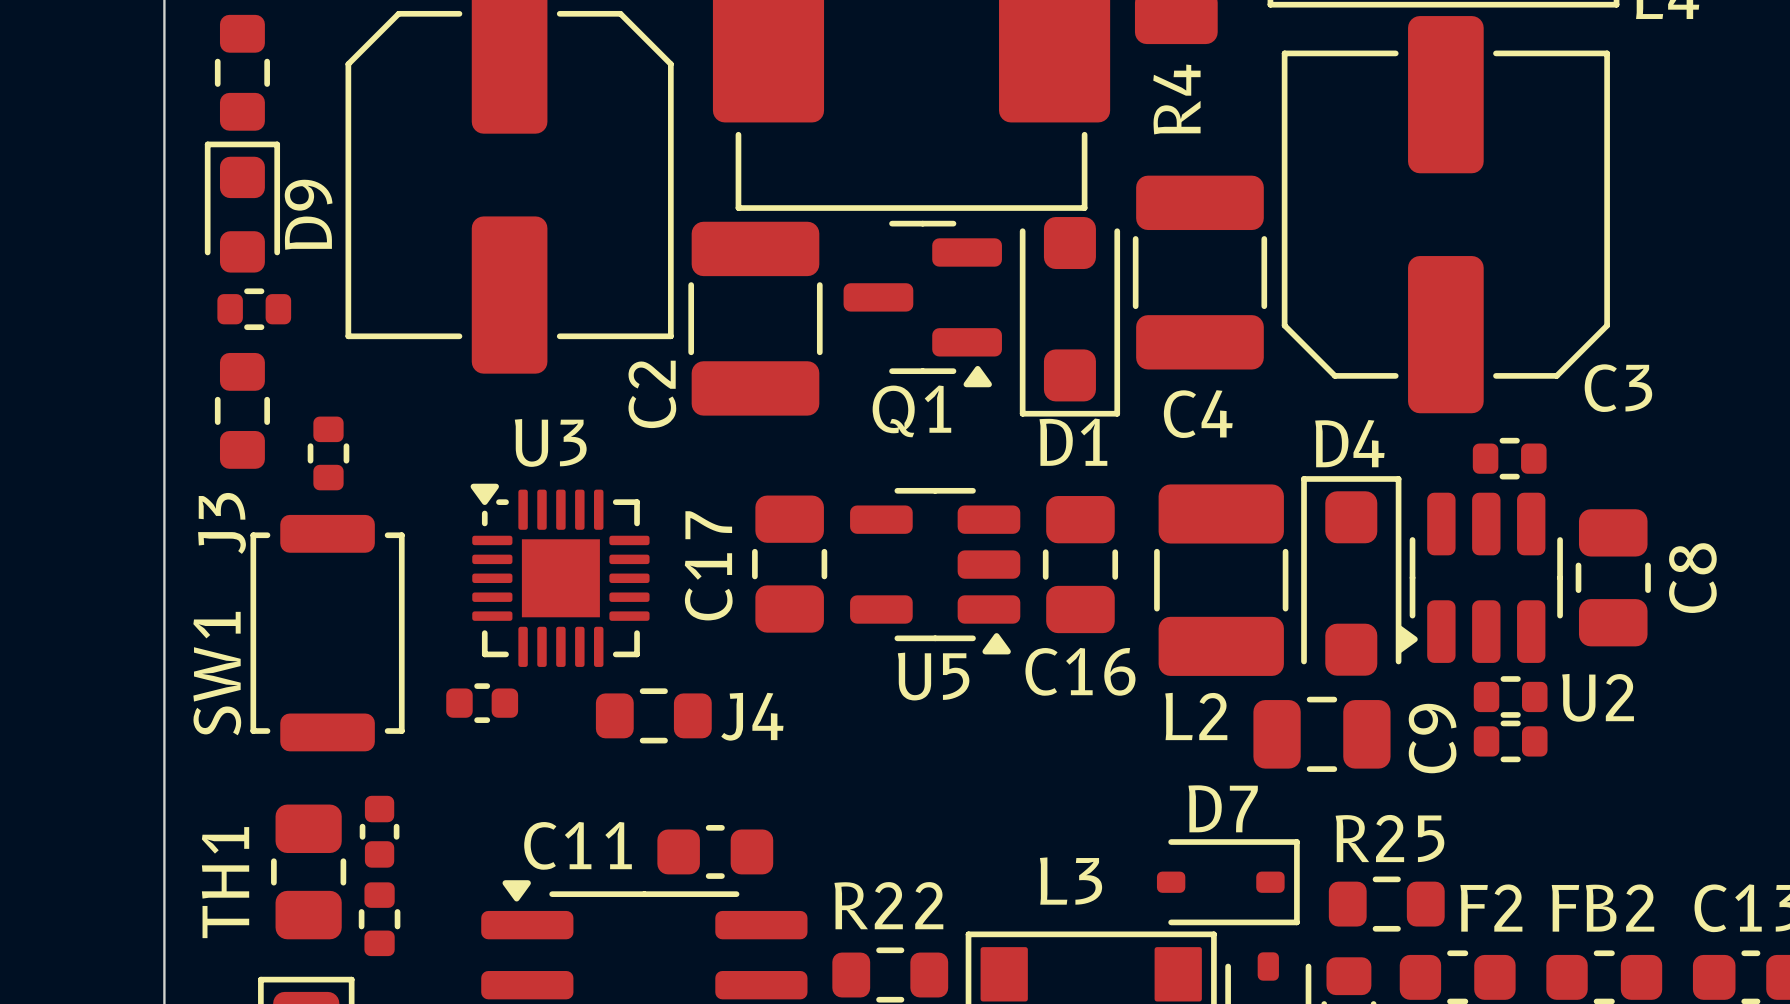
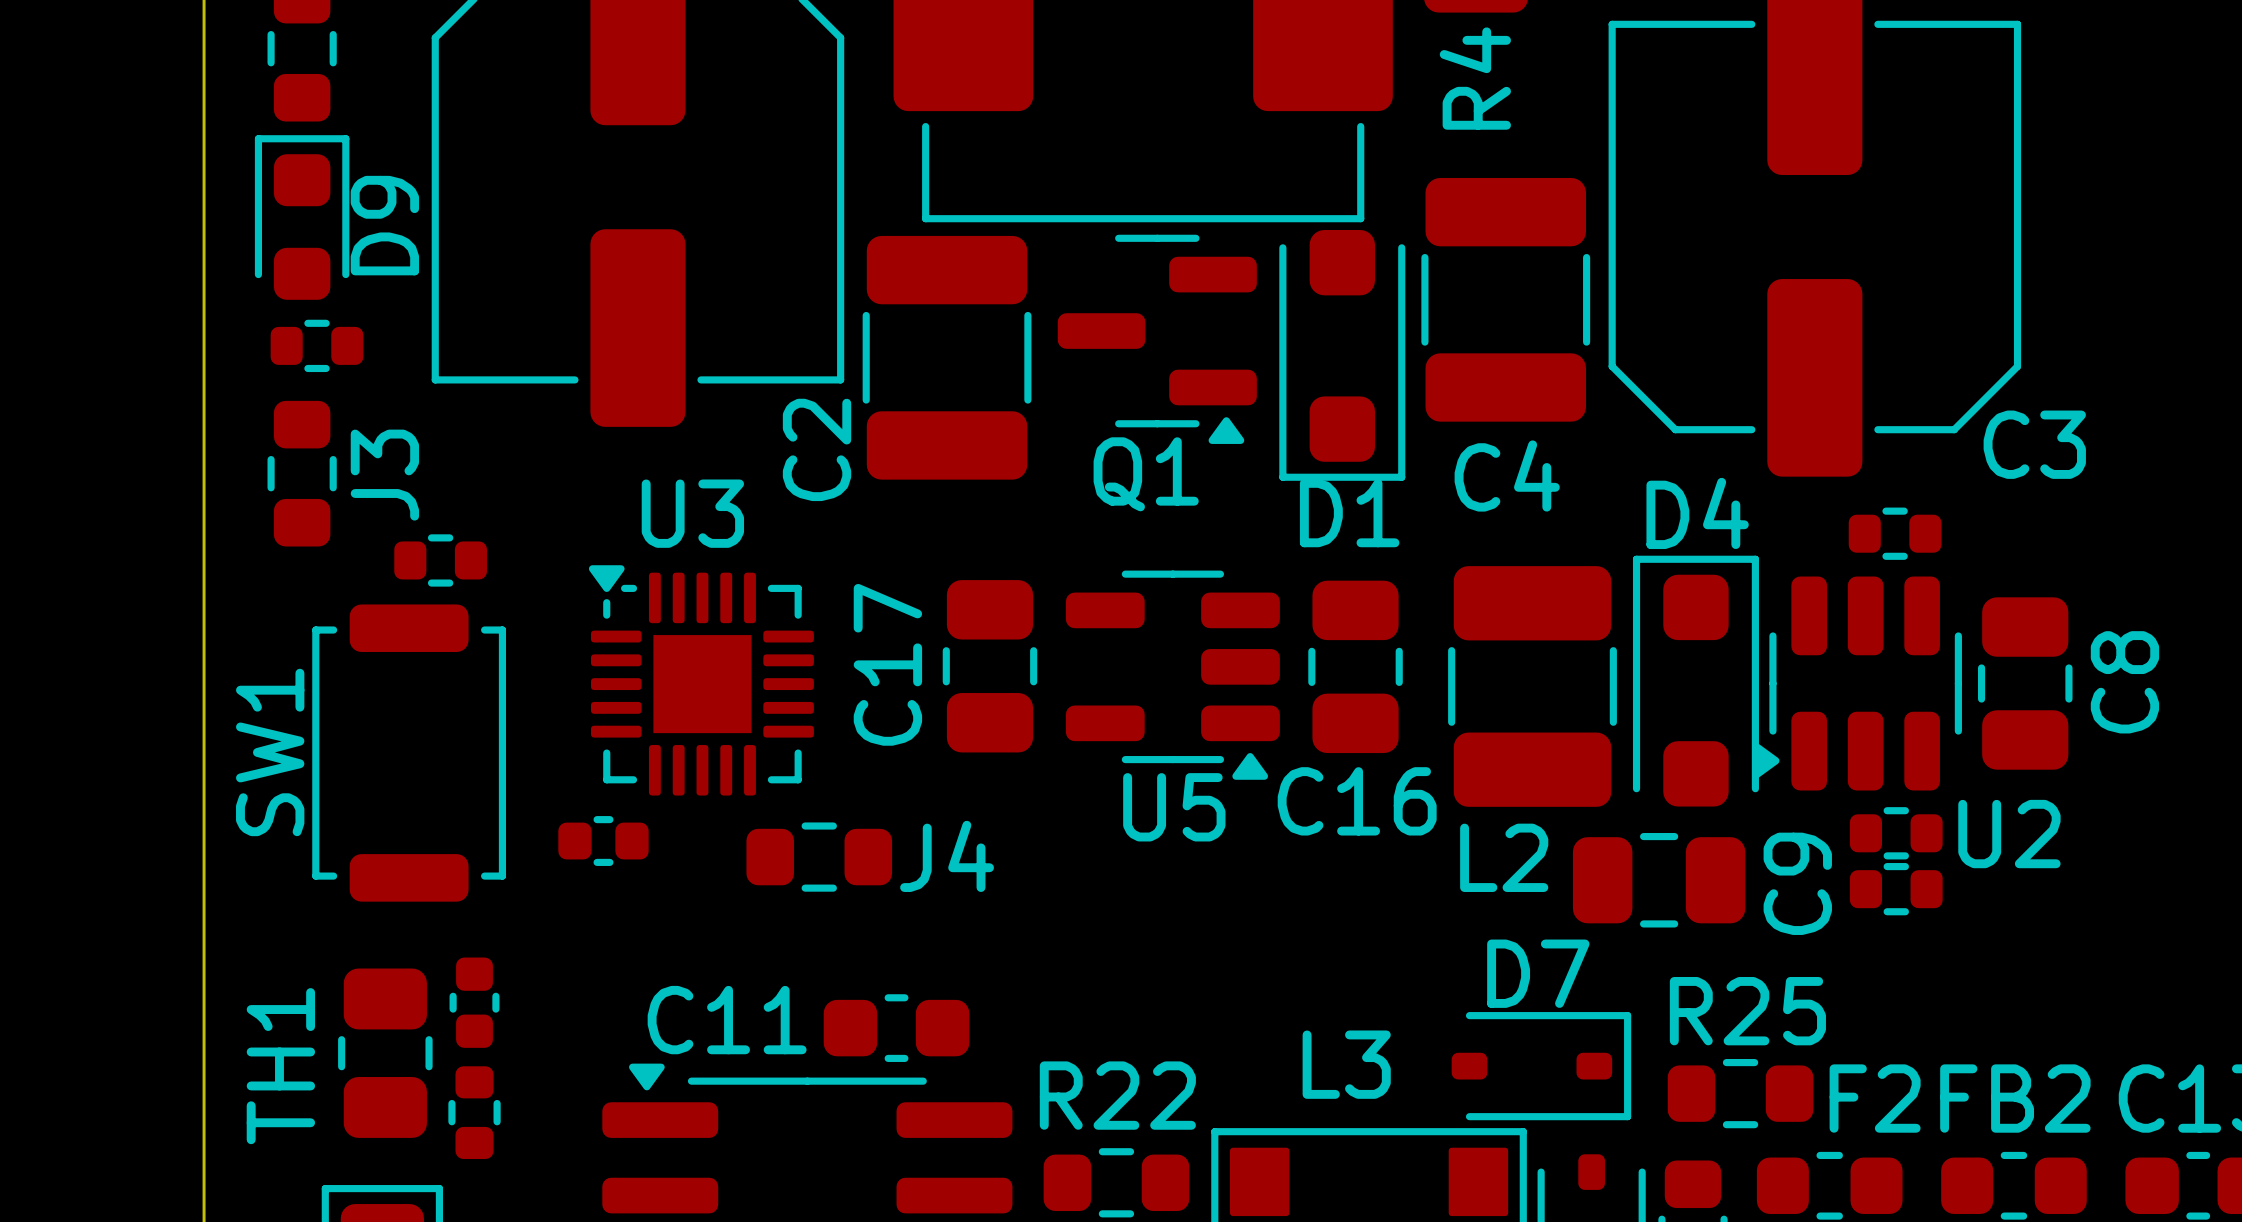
part rotation: 0° (328, 453) -> 90° clockwise (440, 560)
J3 name position: J3 (222, 523) -> J3 (384, 475)
SW1 name position: SW1 (217, 673) -> SW1 (270, 752)

